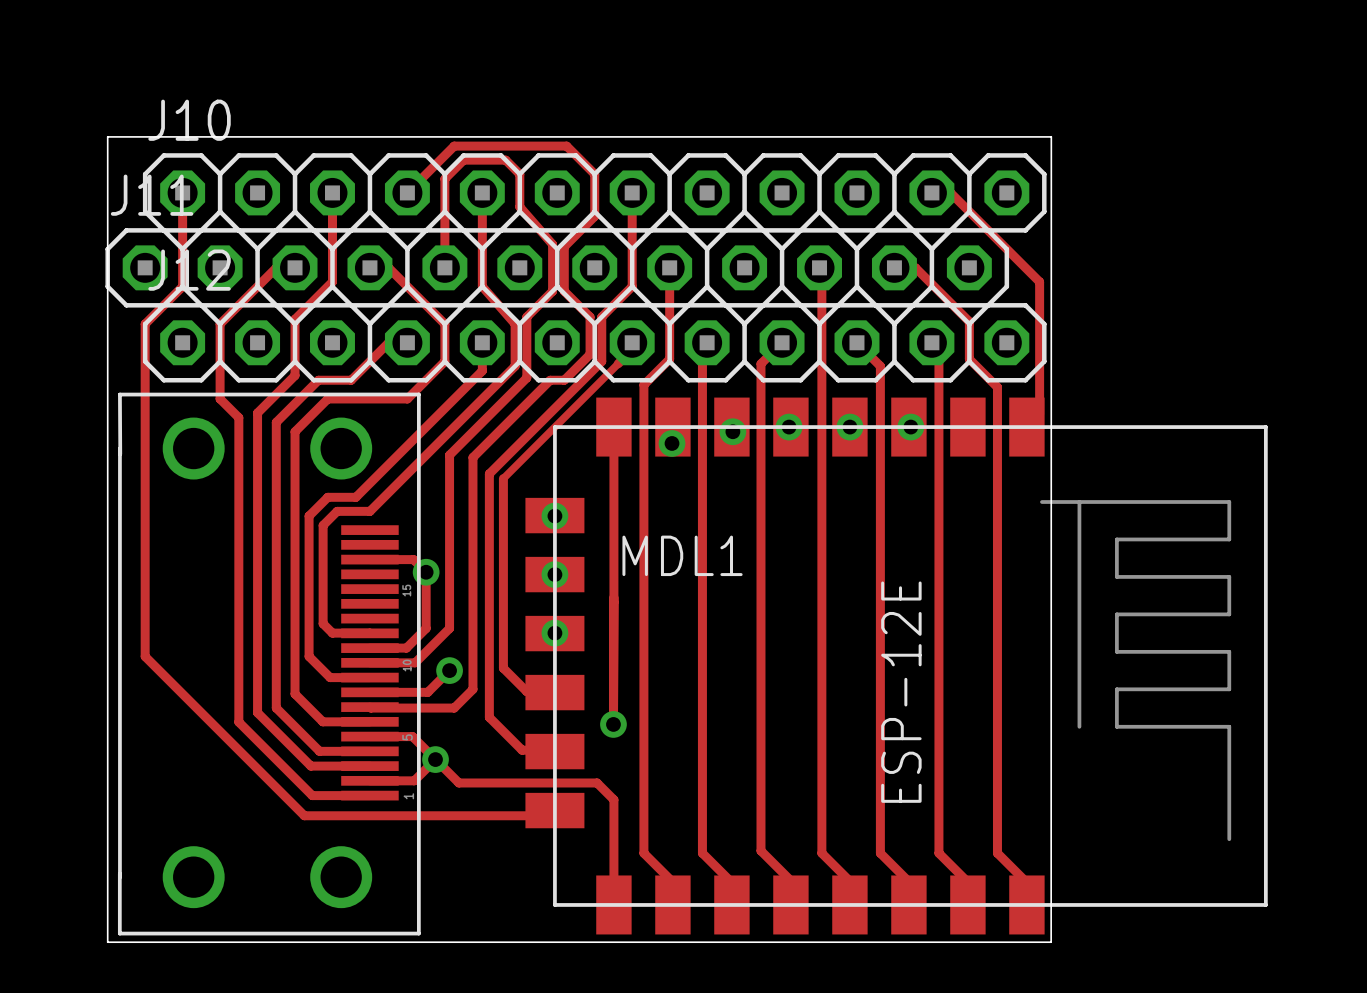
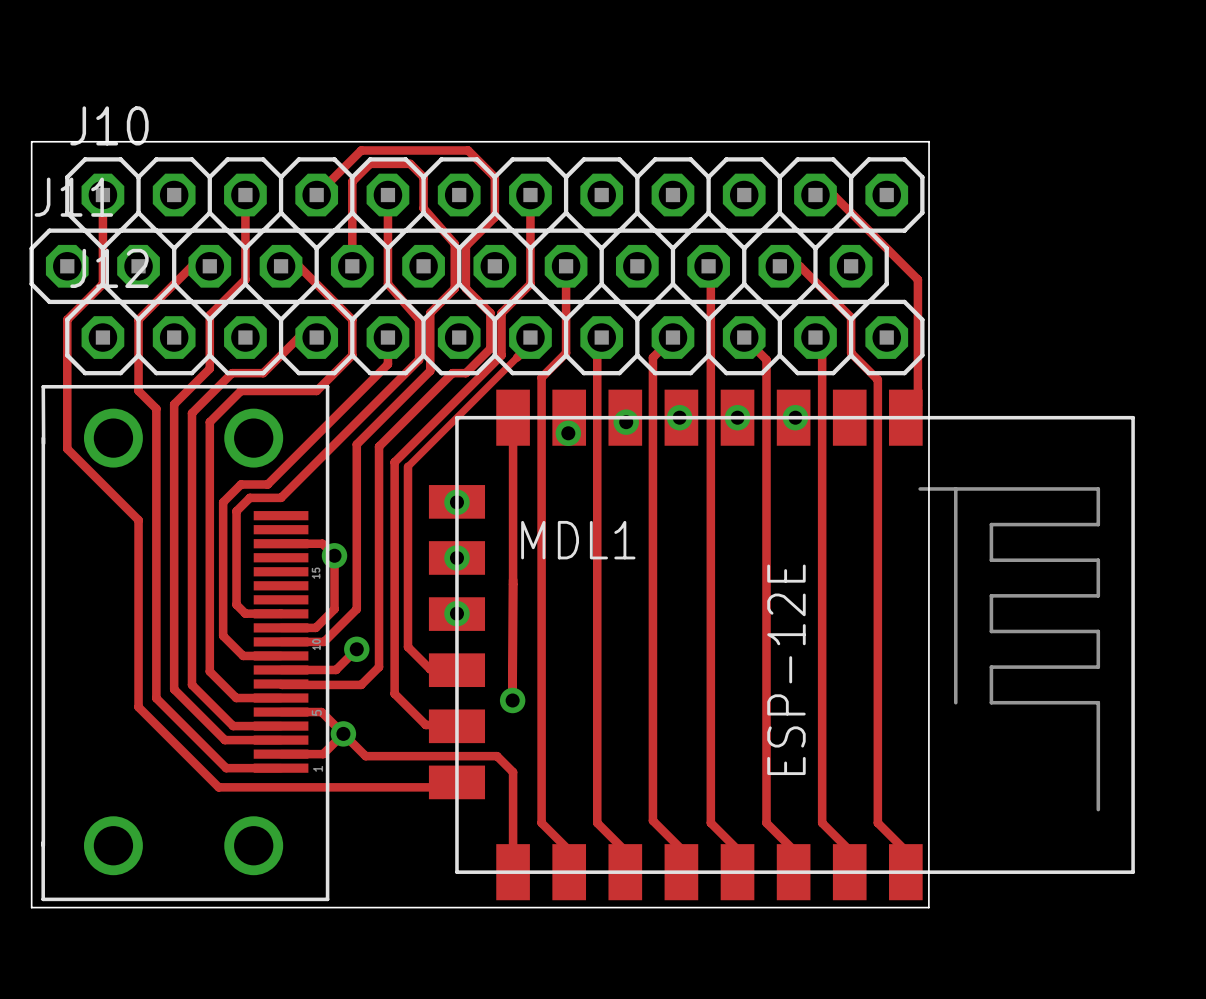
track: (145, 459) (145, 656) (220, 731) -> (67, 448) (138, 520) (138, 707)

